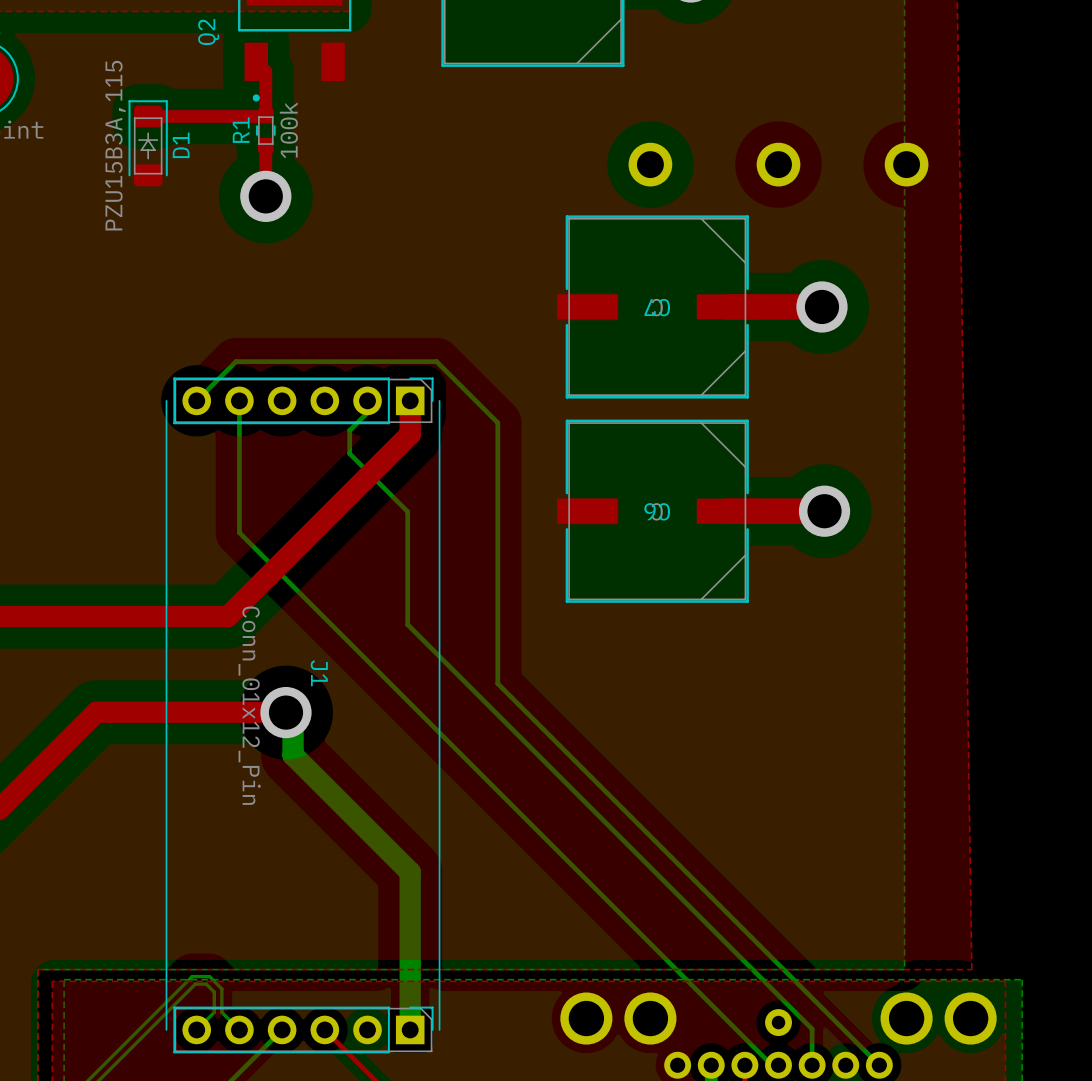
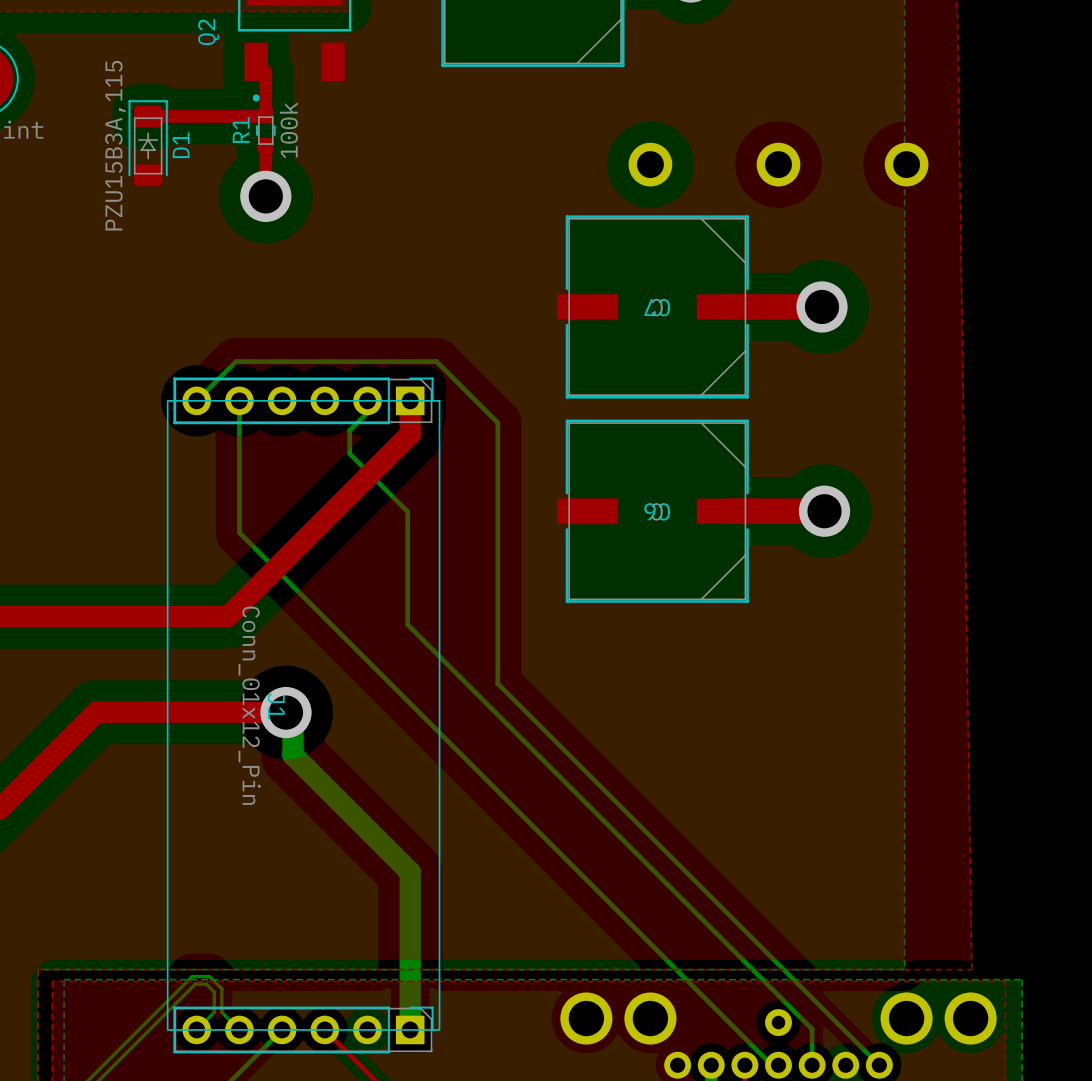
J1 footprint: [165, 377, 441, 1054] -> [166, 377, 441, 1054]
J1 name position: J1 (319, 673) -> J1 (276, 706)

